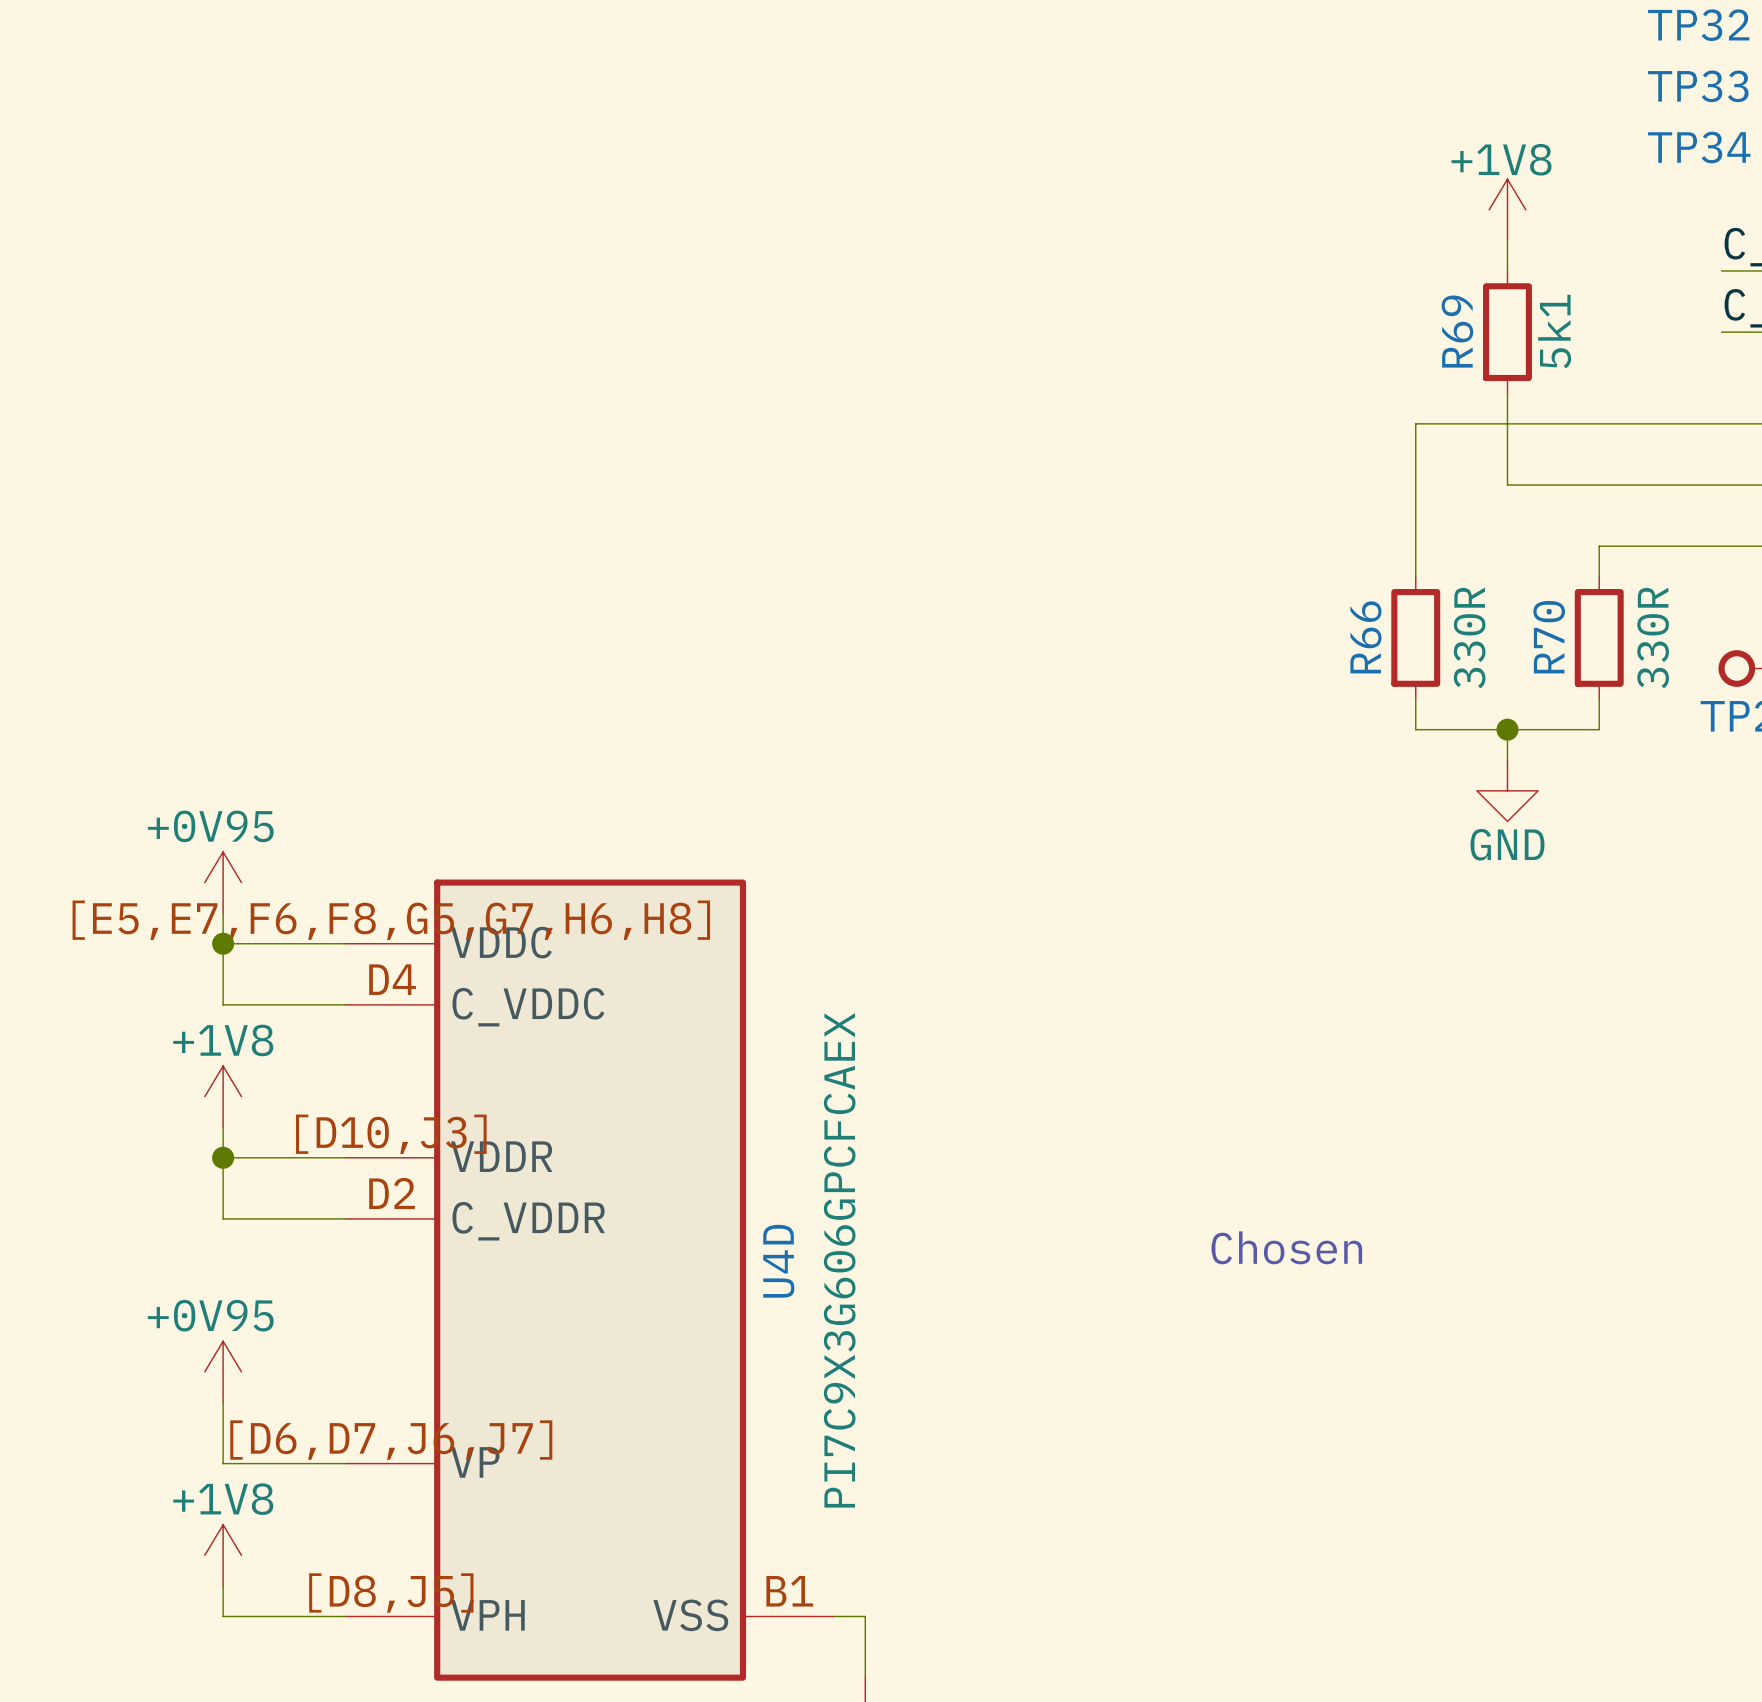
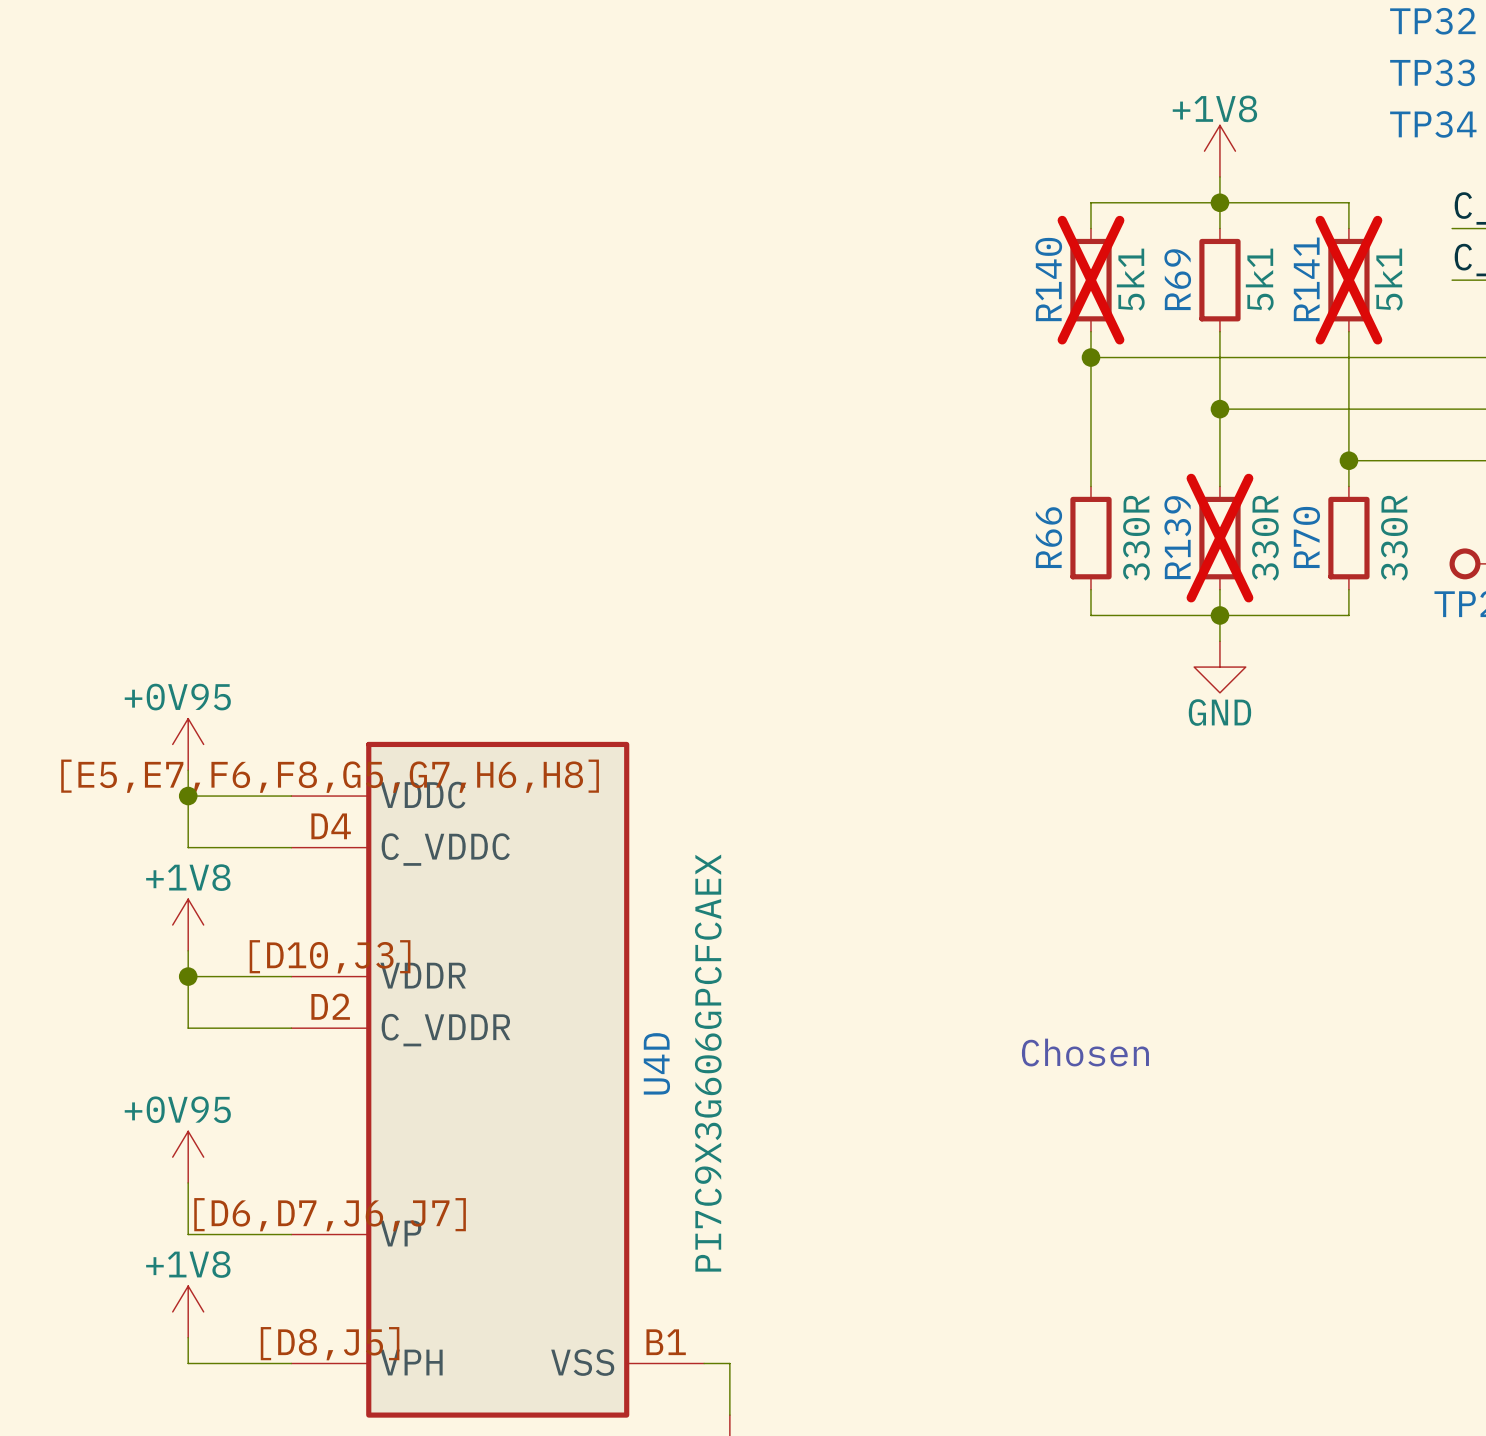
wire: none -> (1219, 176) (1219, 228)
power symbol position: +1V8 (1507, 209) -> +1V8 (1219, 151)
junction: none -> (1219, 202)
wire: (1507, 240) (1507, 270) -> none
wire: none -> (1090, 228) (1090, 202) (1348, 202) (1348, 228)
R140: none -> (1090, 280)
R69 position: (1507, 332) -> (1219, 280)
R141: none -> (1348, 280)
wire: none -> (1090, 331) (1090, 486)
wire: none -> (1219, 331) (1219, 486)
wire: (1507, 393) (1507, 485) -> (1219, 409) (1271, 409)
wire: none -> (1348, 331) (1348, 460)
junction: none -> (1090, 357)
wire: (1415, 423) (1415, 576) -> (1194, 357) (1090, 357)
junction: none -> (1219, 409)
junction: none -> (1348, 460)
R66 position: (1415, 637) -> (1090, 538)
R139: none -> (1219, 538)
wire: (1415, 699) (1415, 729) -> (1090, 589) (1090, 615) (1194, 615)
wire: none -> (1219, 589) (1219, 641)
wire: (1507, 729) (1507, 760) -> none
junction position: (1507, 729) -> (1219, 615)
power symbol position: GND (1507, 790) -> GND (1219, 667)

